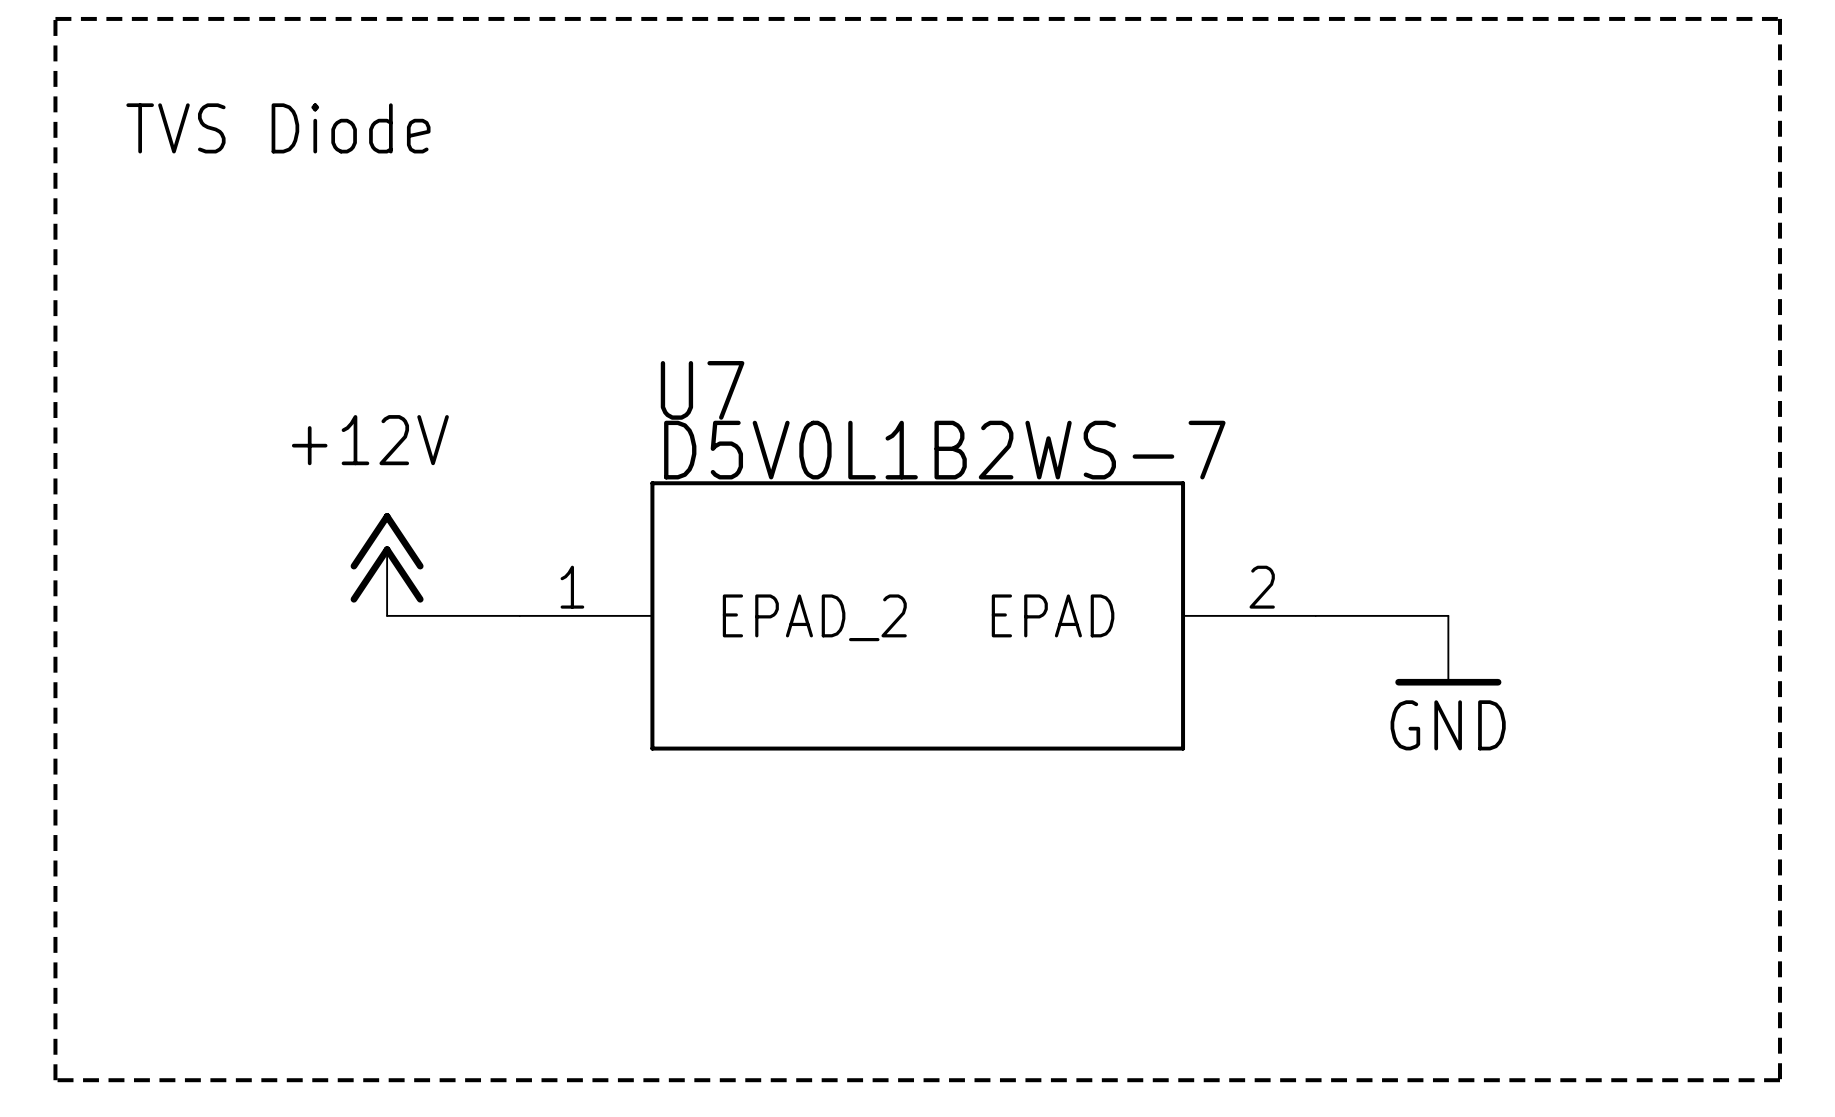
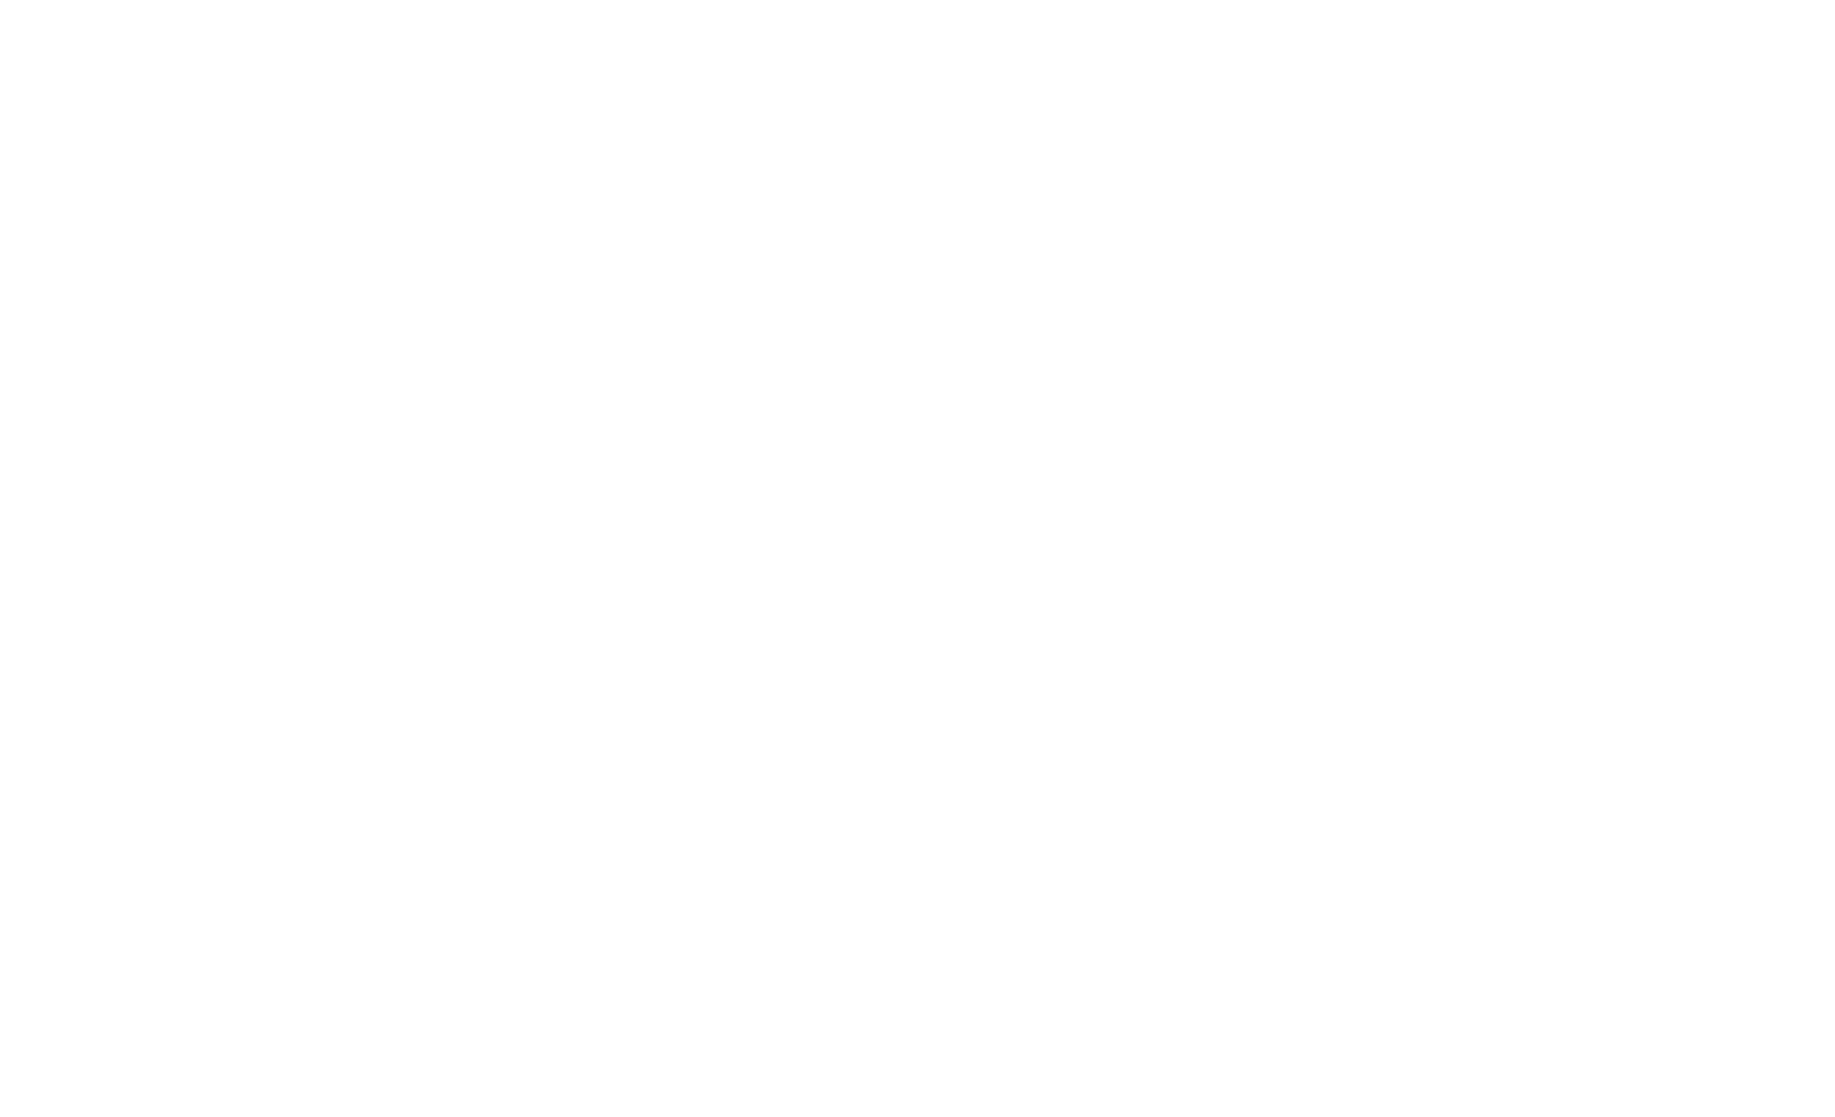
line: (55, 18) (1780, 18) (1780, 1080) (55, 1080) (55, 18) -> none
text: TVS Diode (278, 128) -> none
power symbol: +12V (387, 564) -> none
wire: (387, 615) (519, 615) -> none
U7: D5V0L1B2WS-7 (917, 615) -> none
wire: (1315, 615) (1448, 615) -> none
power symbol: GND (1448, 650) -> none

